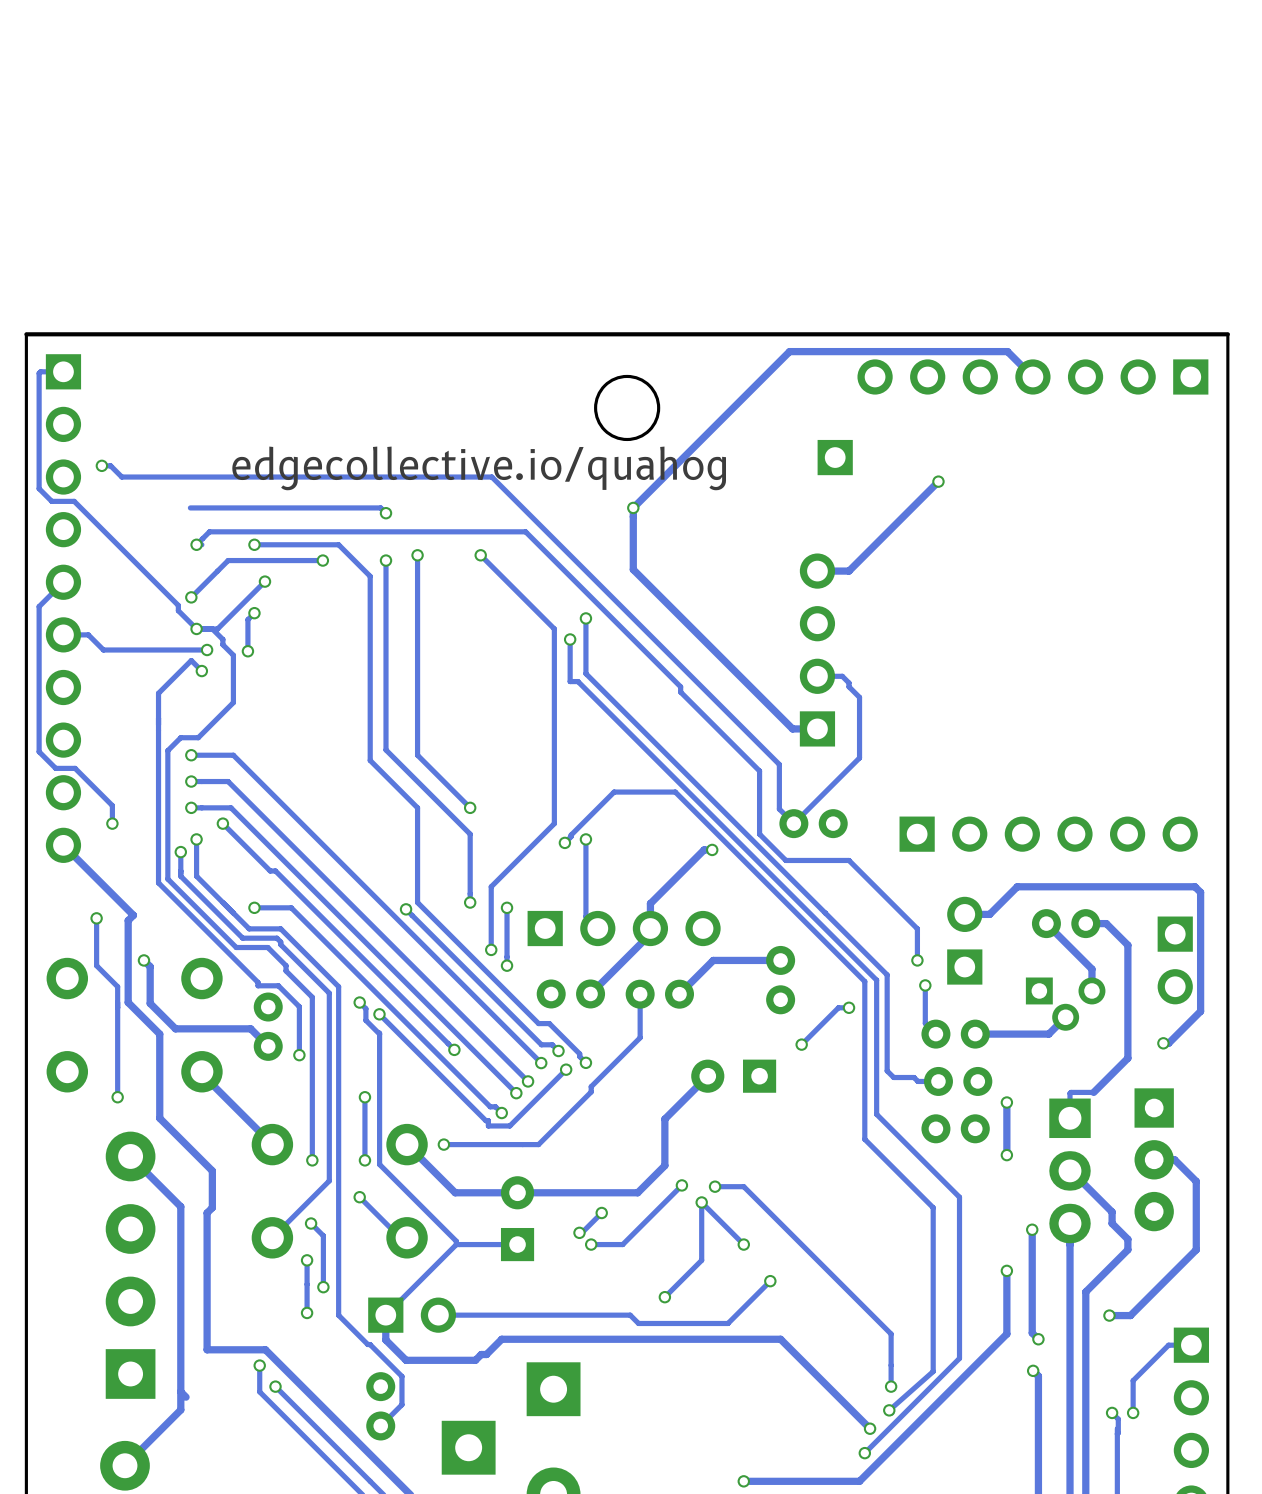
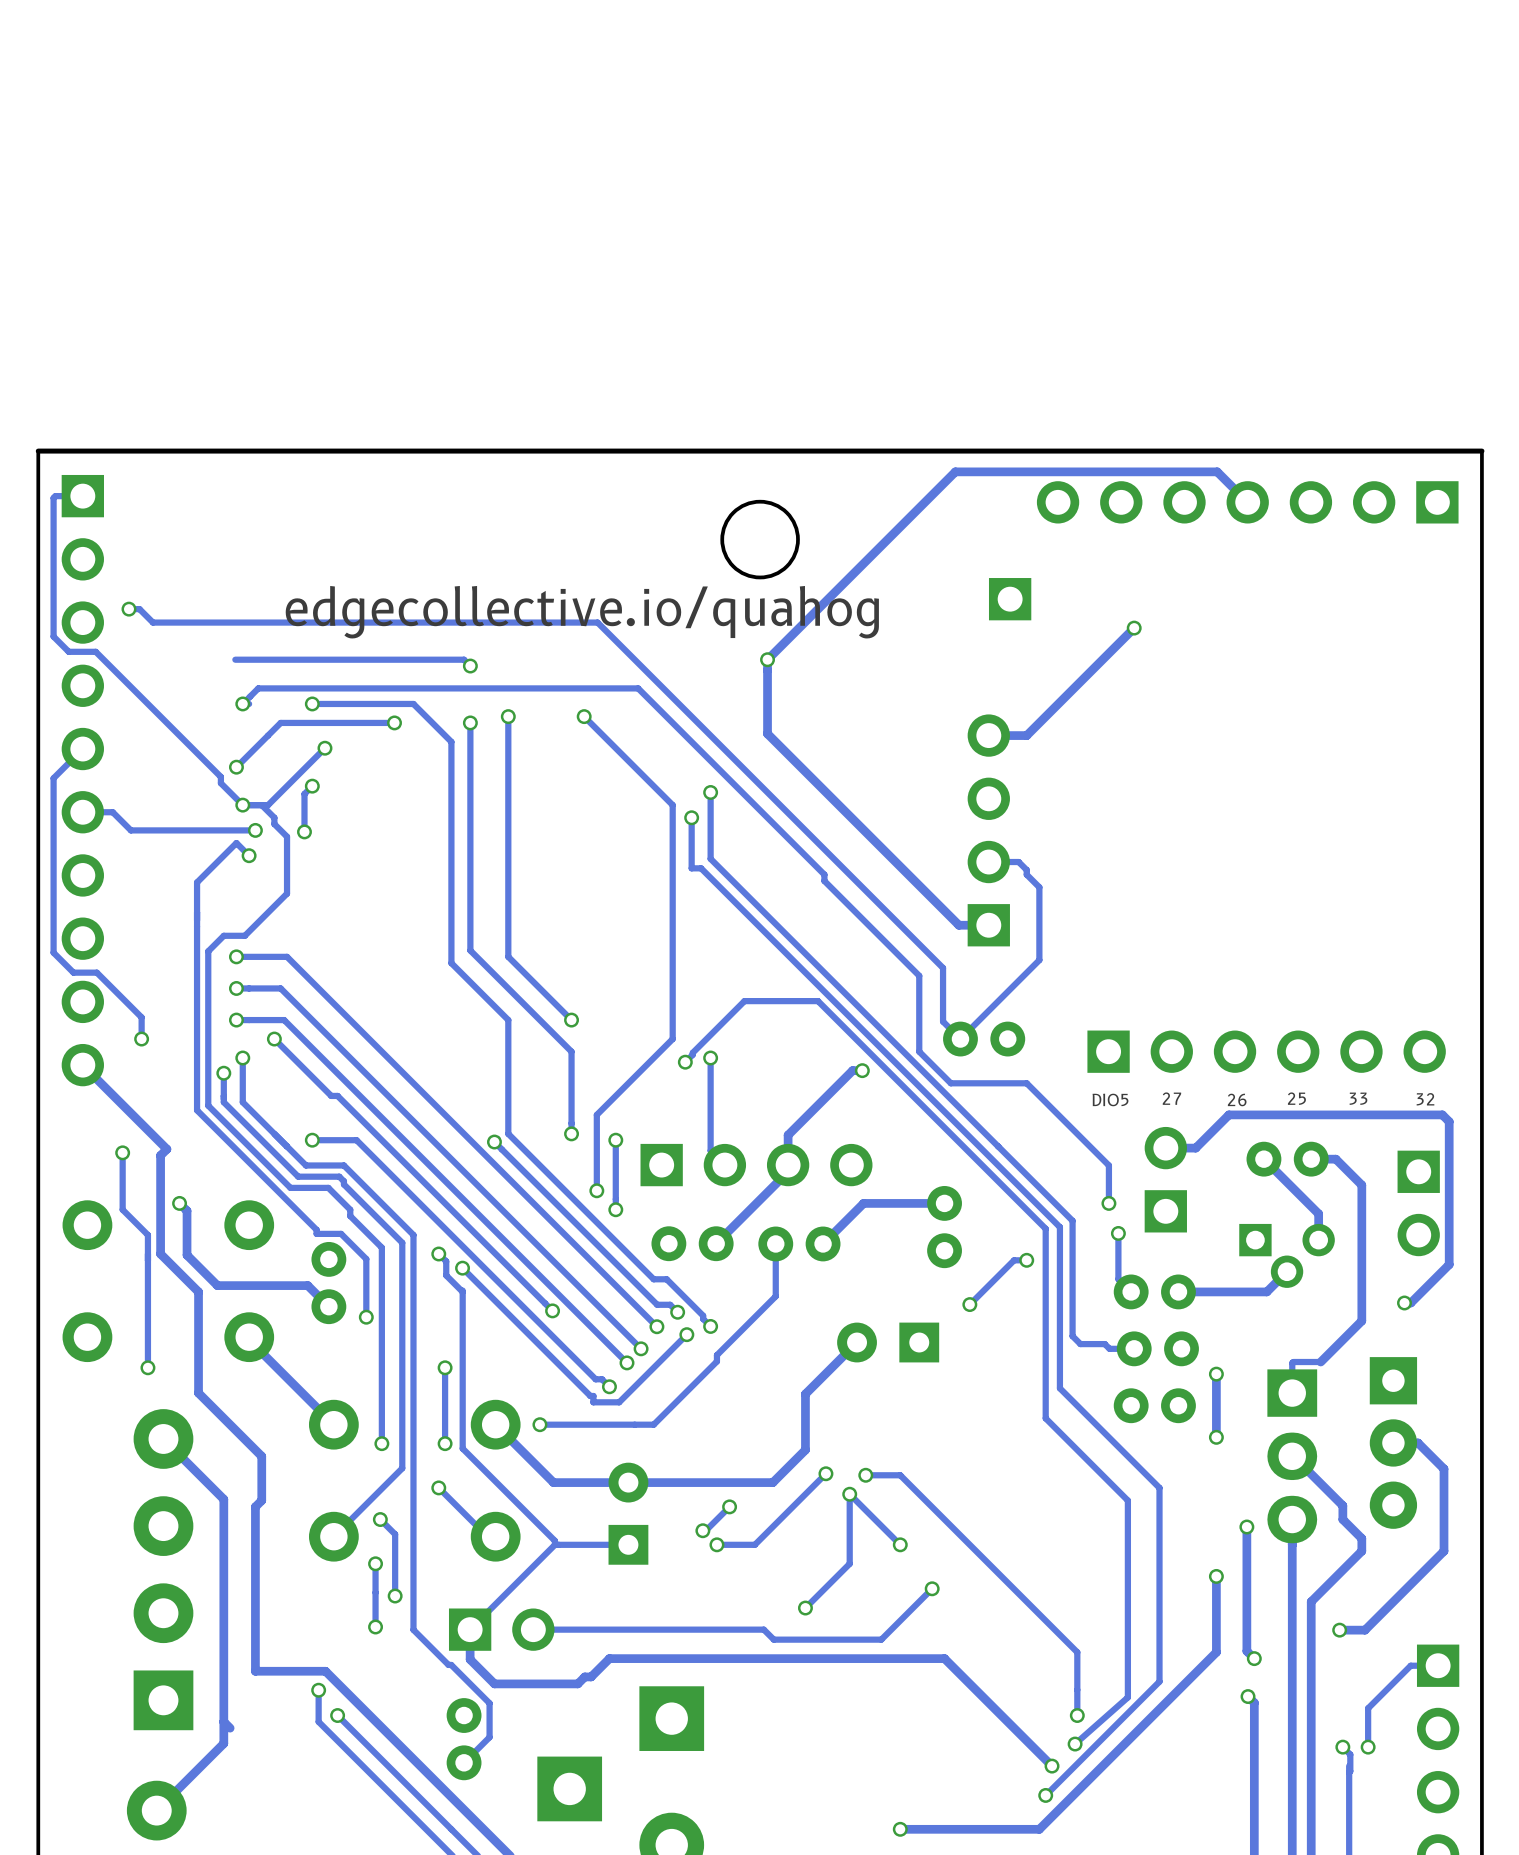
text: none -> 27 (1171, 1098)
text: none -> 25 (1296, 1098)
text: none -> 33 (1358, 1098)
text: none -> 32 (1425, 1099)
text: none -> DIO5 (1110, 1099)
text: none -> 26 (1237, 1099)

